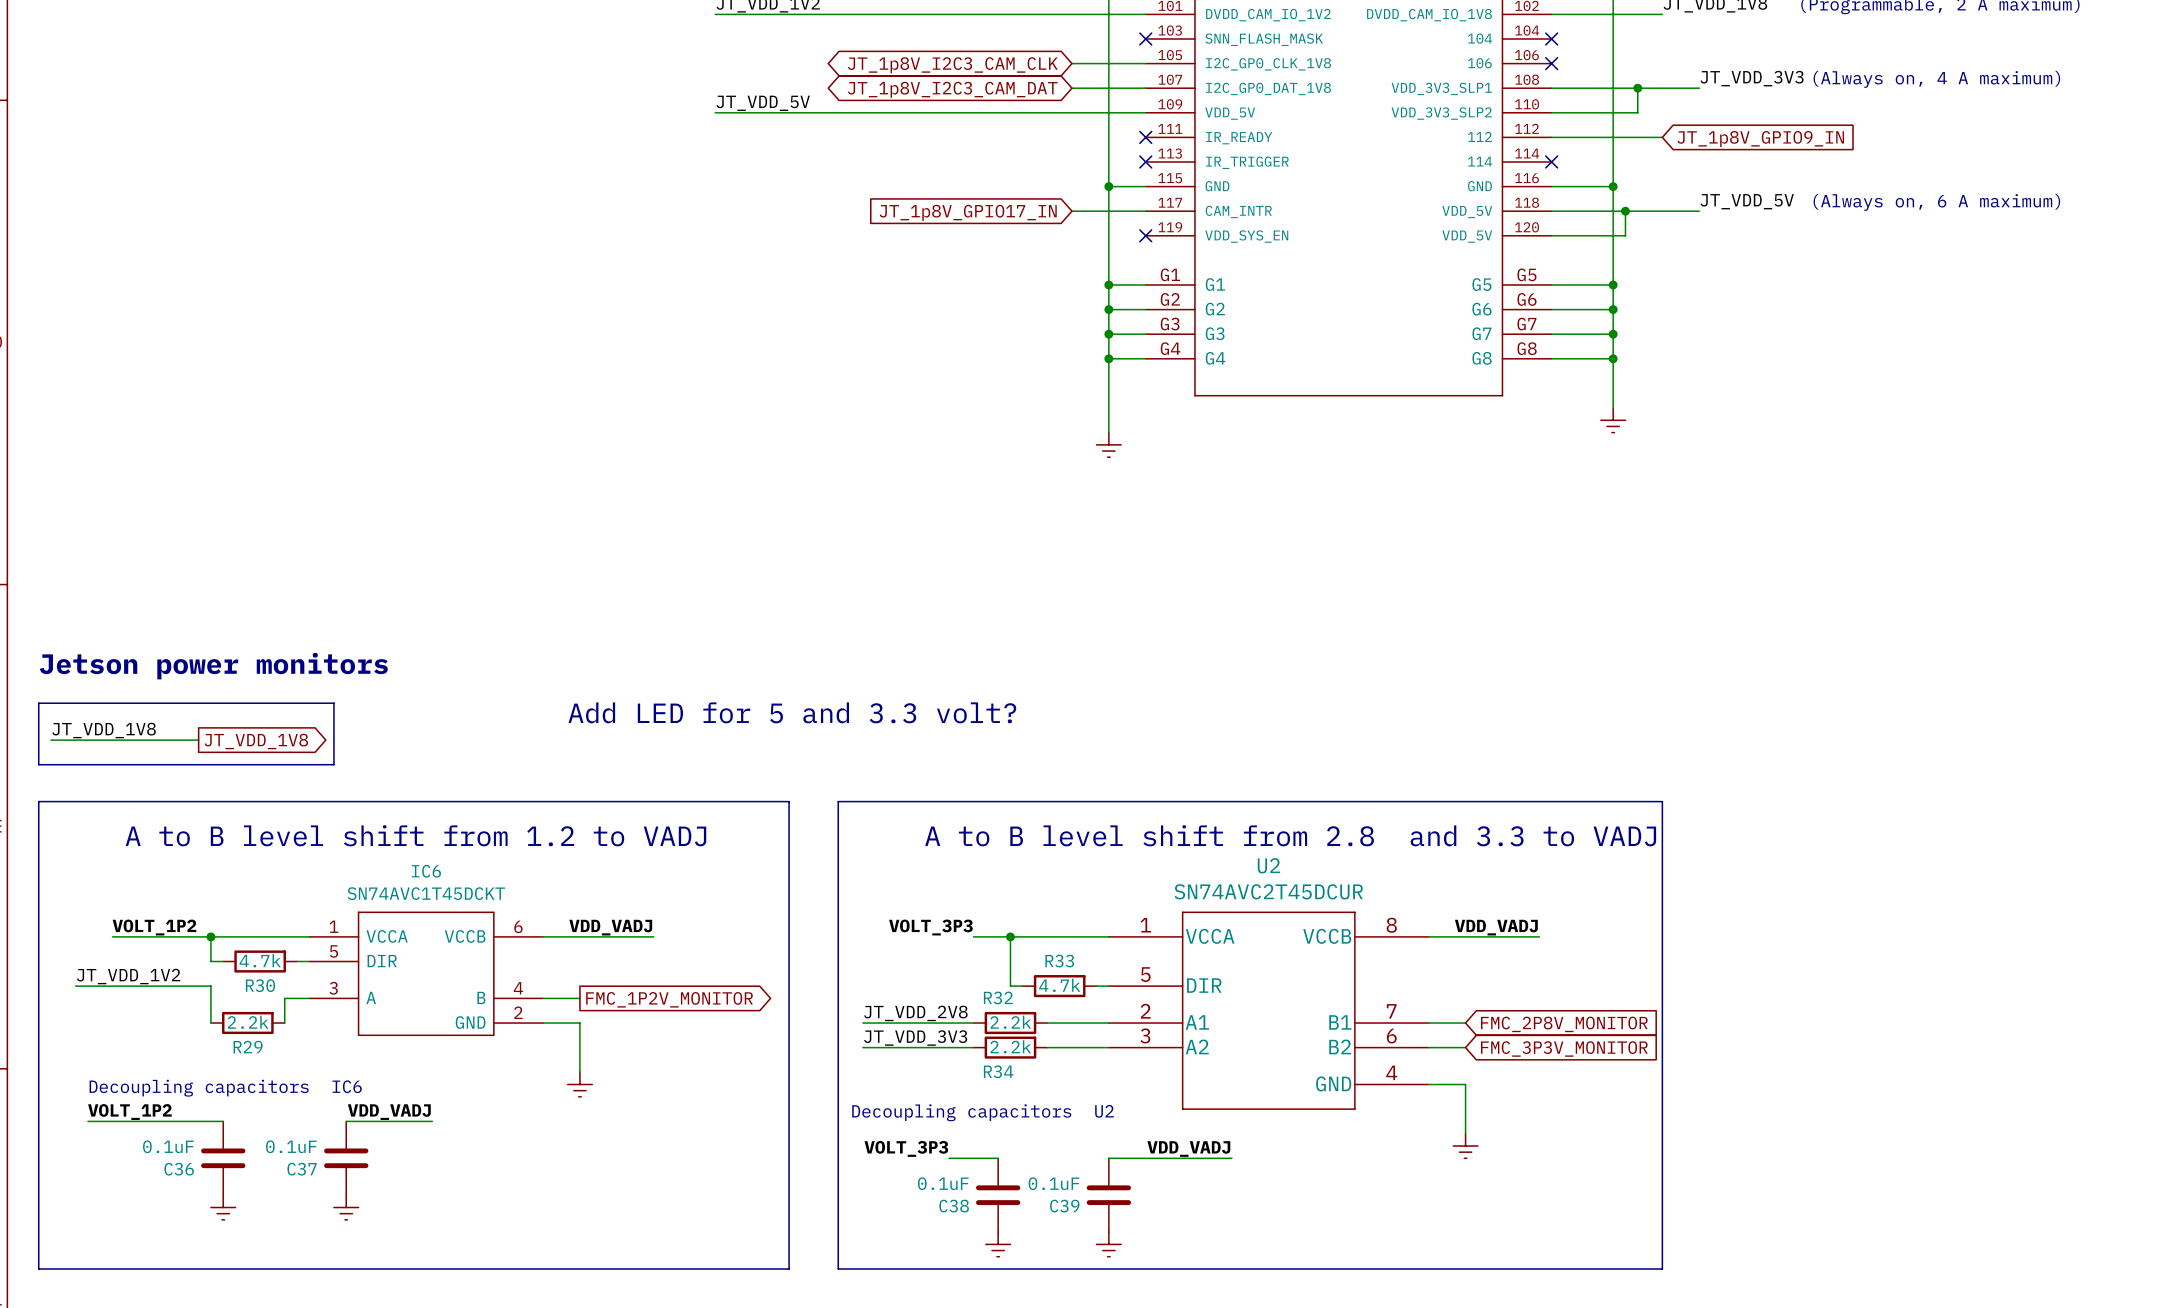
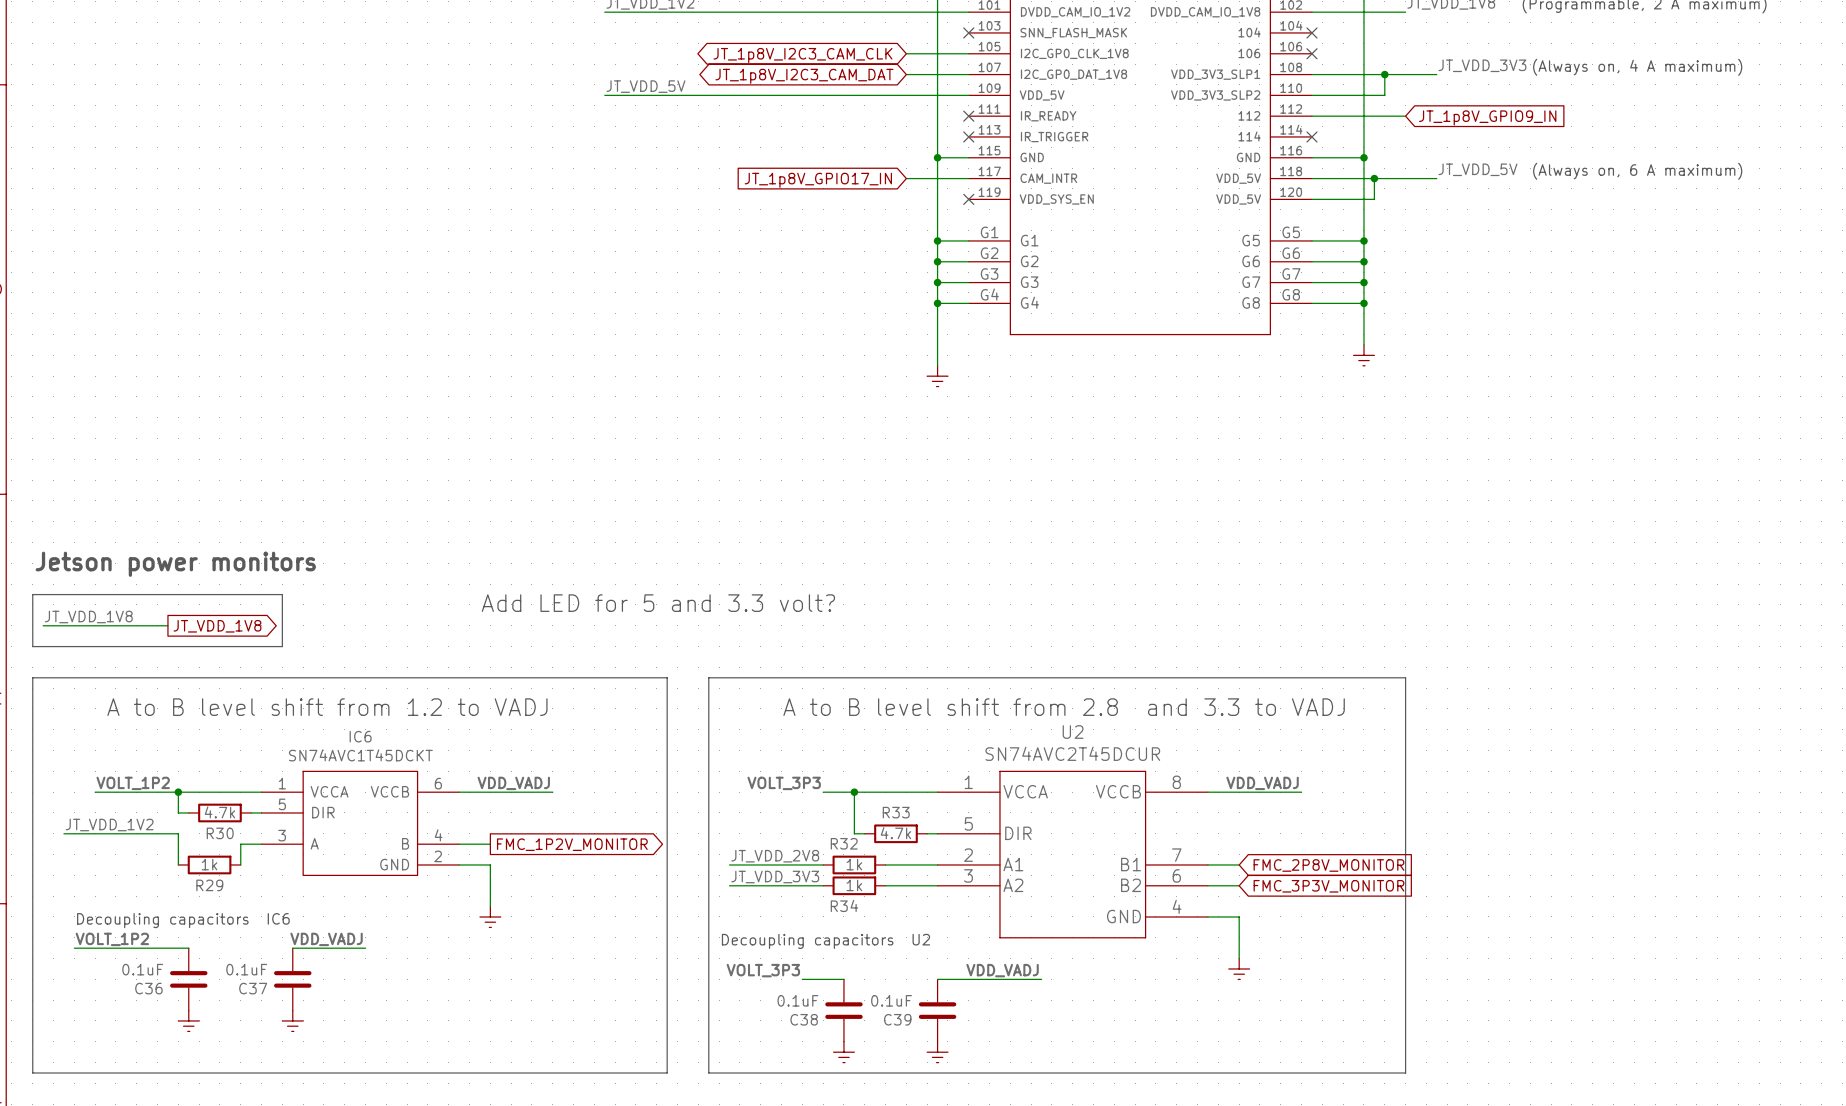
R29 value: 2.2k (248, 1022) -> 1k (209, 864)
R32 value: 2.2k (1010, 1022) -> 1k (854, 864)
R34 value: 2.2k (1010, 1046) -> 1k (854, 885)

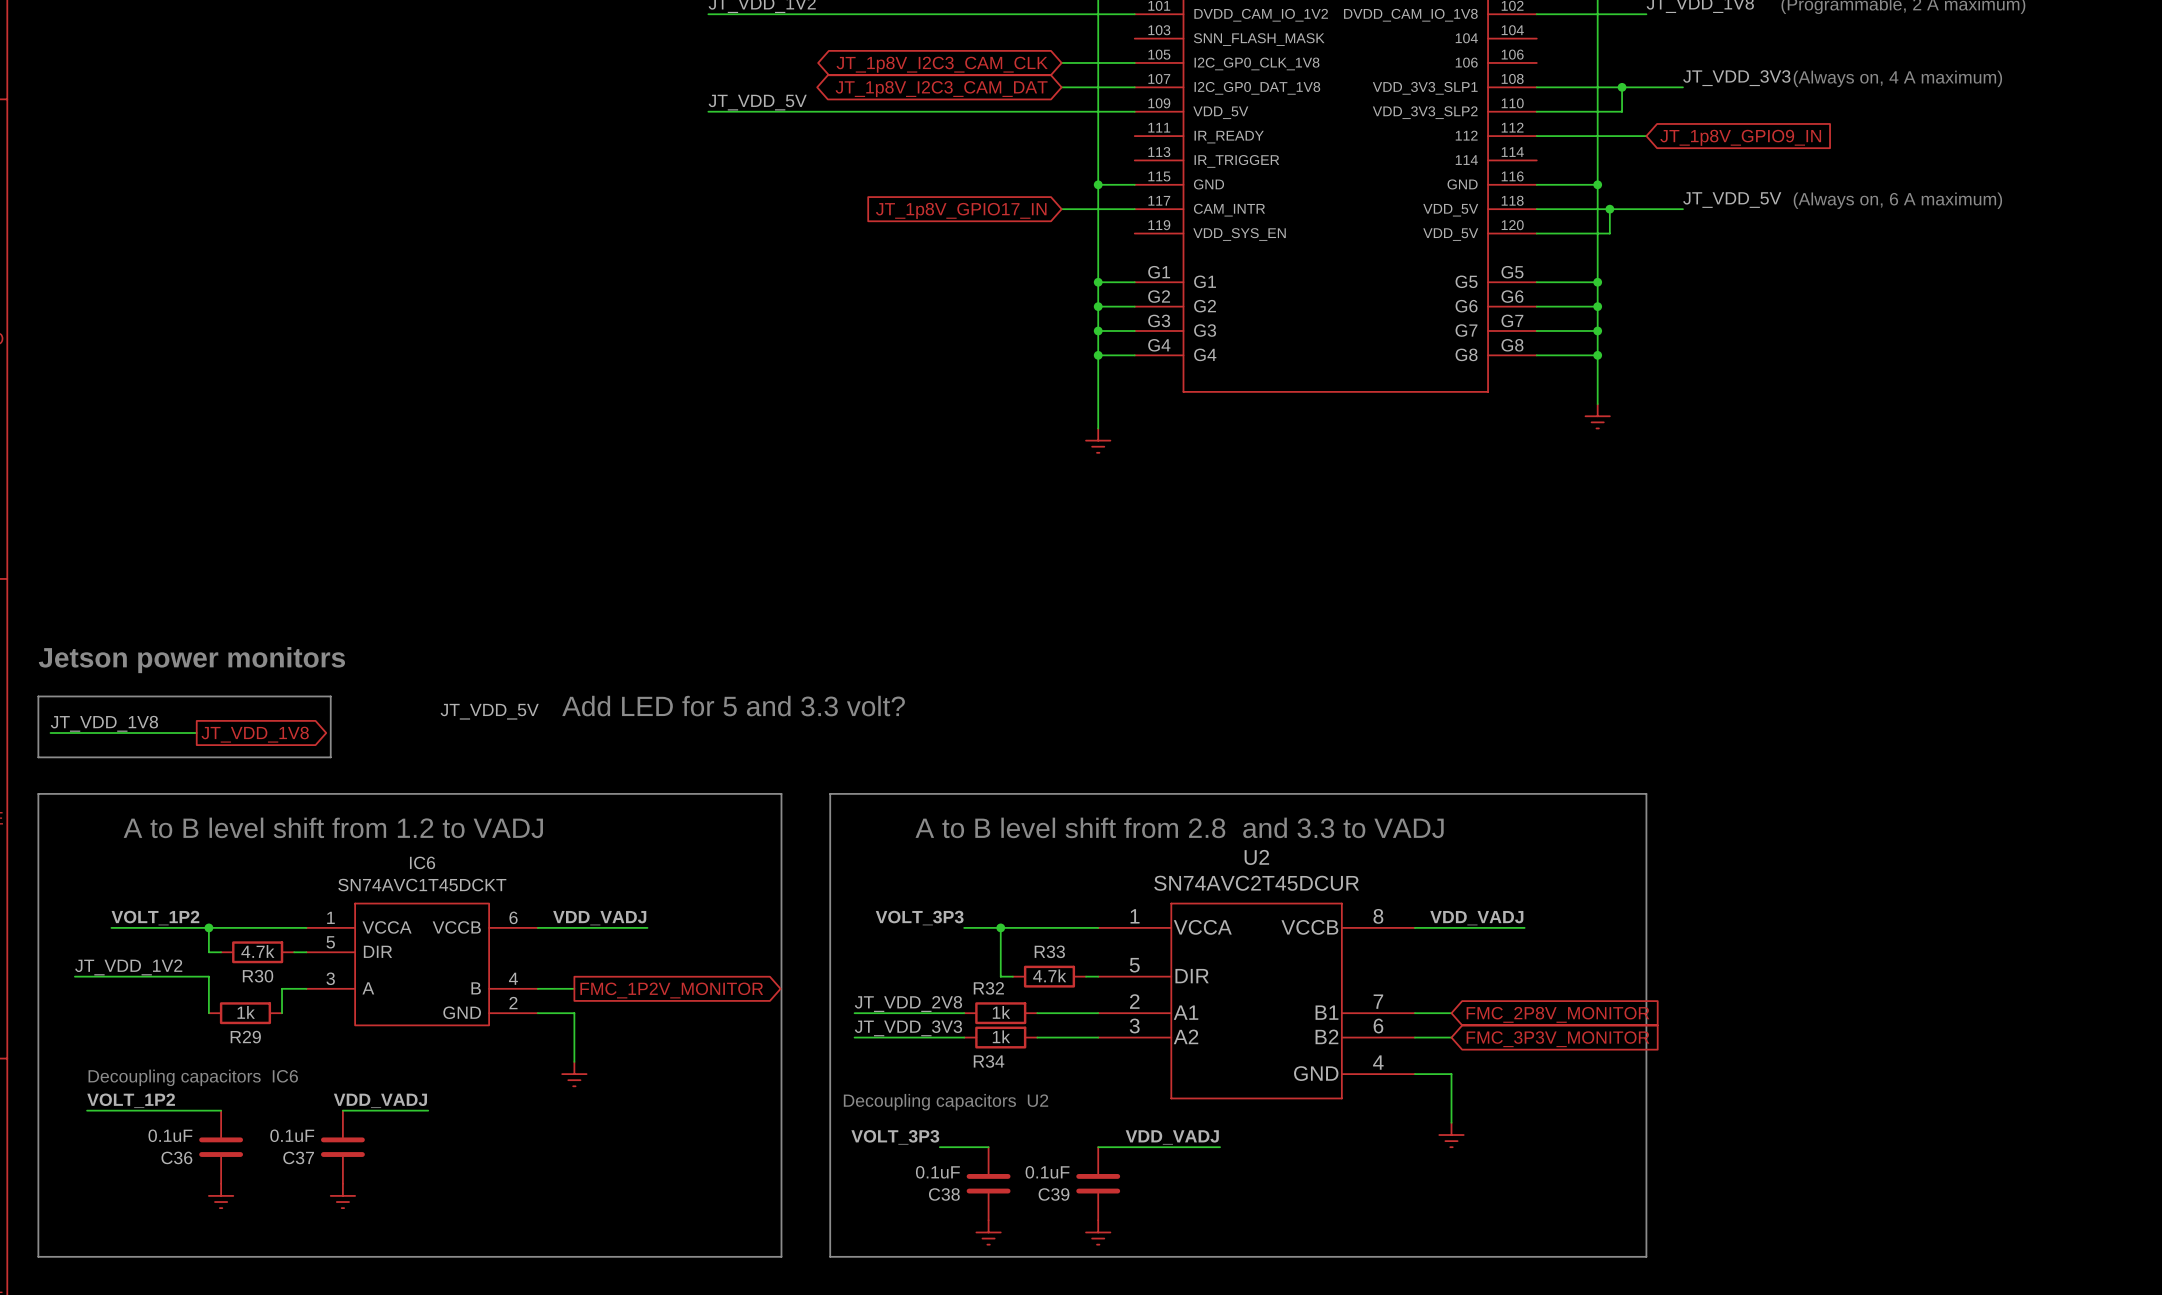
no-connect mark: (968, 32) -> none
no-connect mark: (1311, 32) -> none
no-connect mark: (1311, 53) -> none
no-connect mark: (968, 116) -> none
no-connect mark: (968, 136) -> none
no-connect mark: (1311, 136) -> none
no-connect mark: (968, 199) -> none
label: none -> JT_VDD_5V (489, 711)

